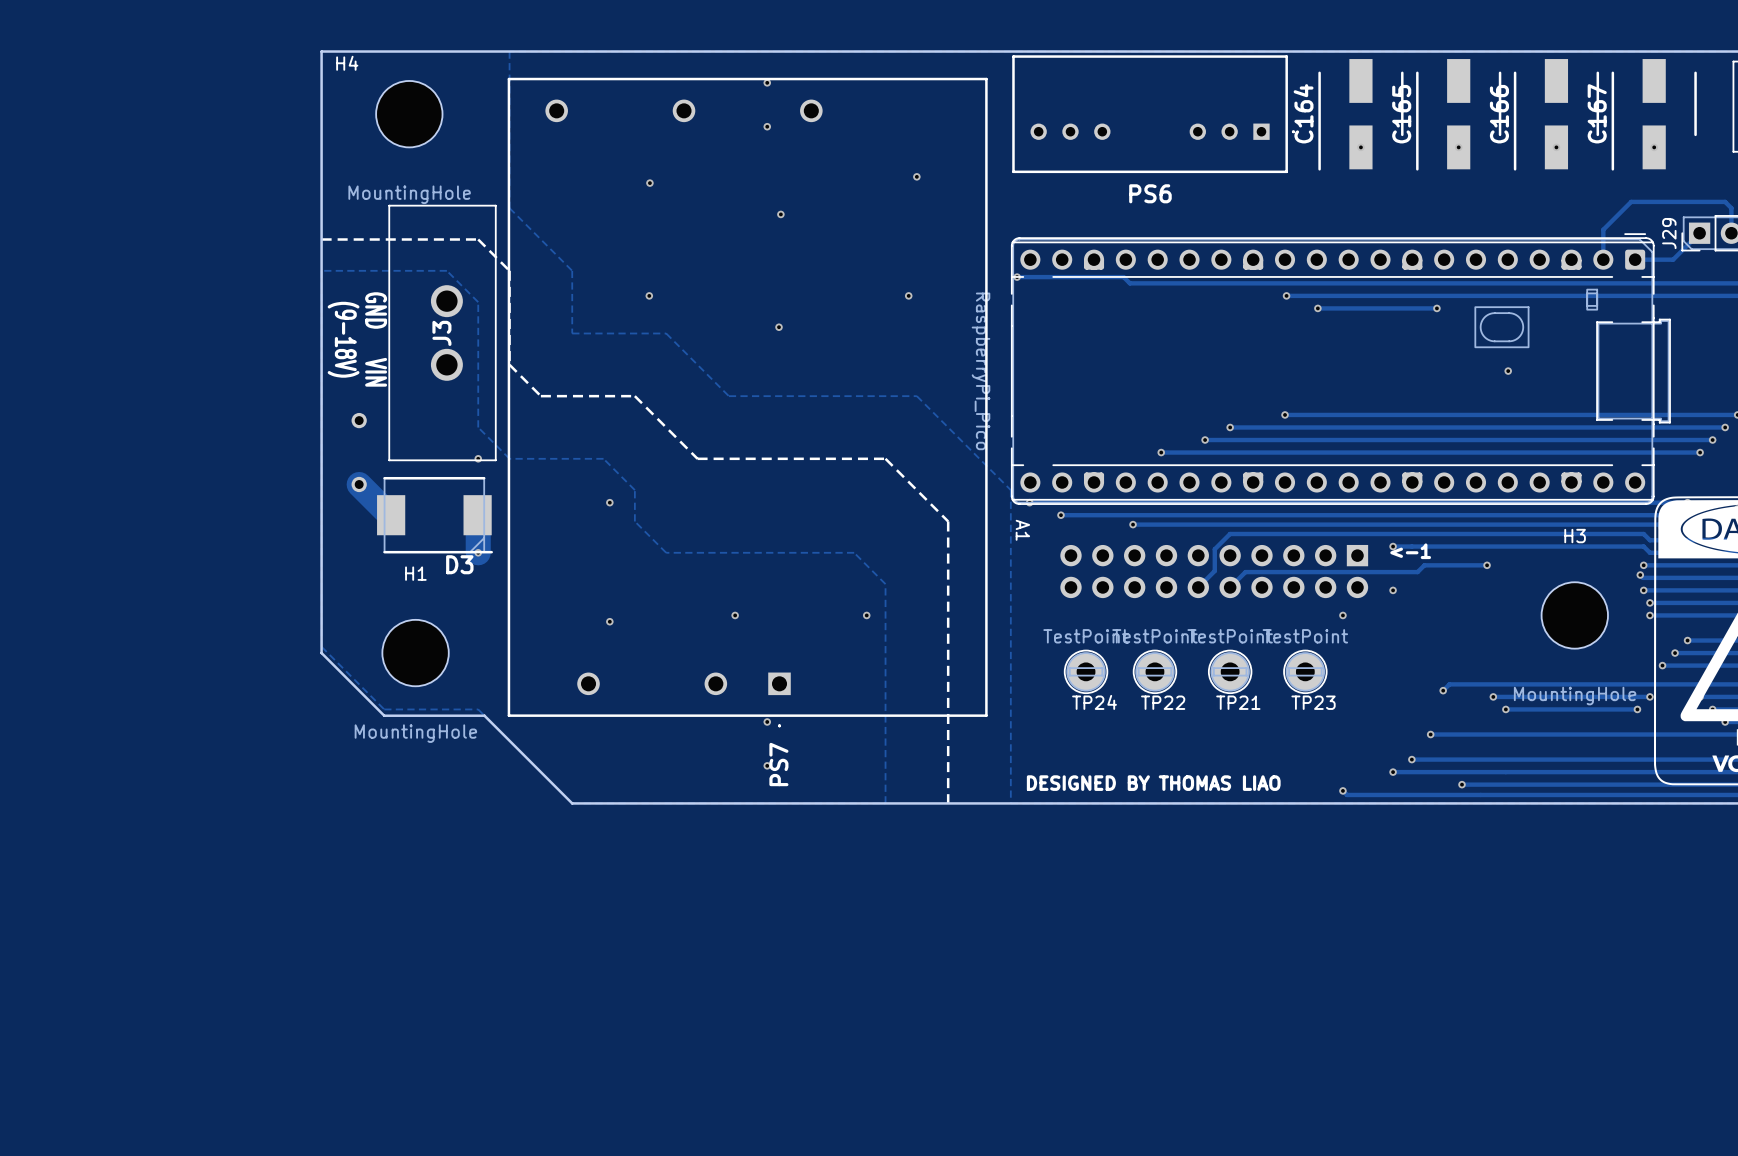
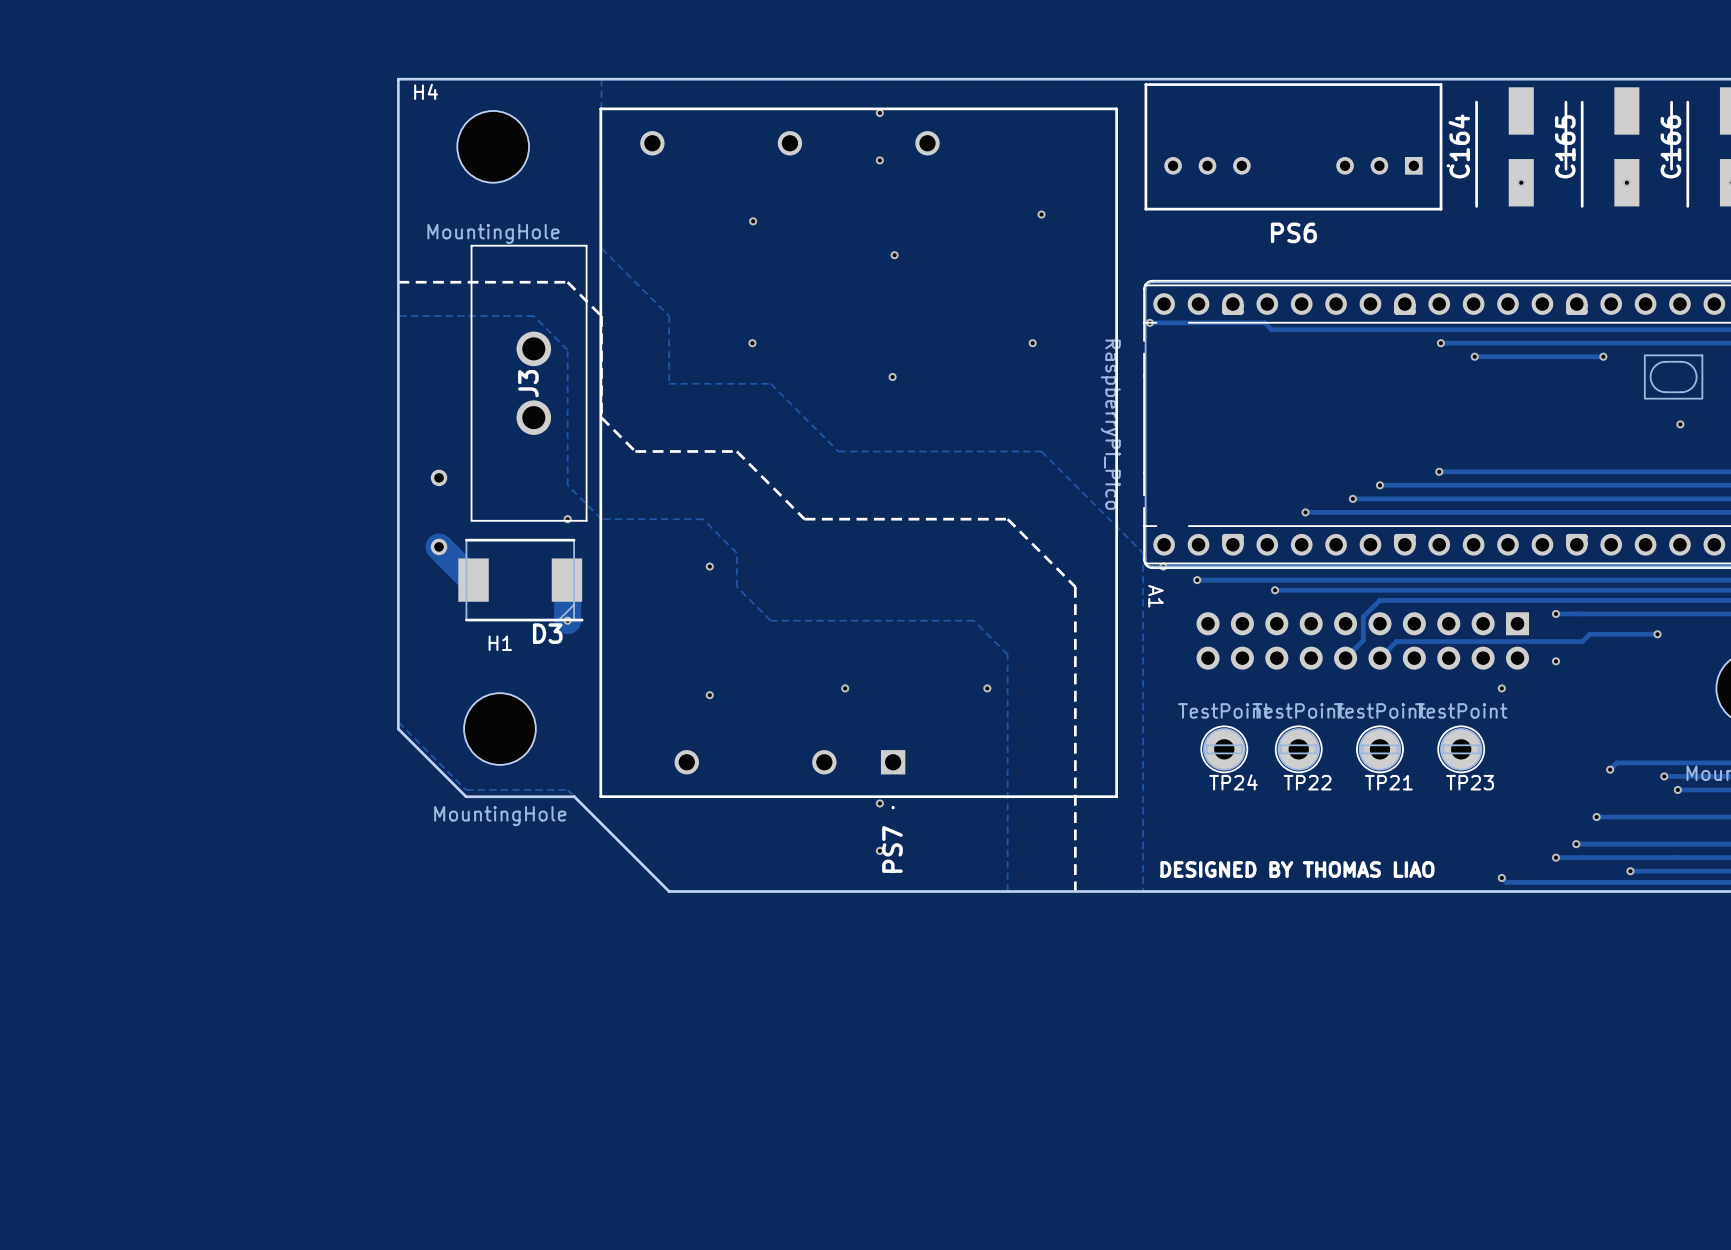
text: (9-18V) (343, 339) -> none
text: GND VIN (376, 339) -> none
text: <-1 (1410, 551) -> none

